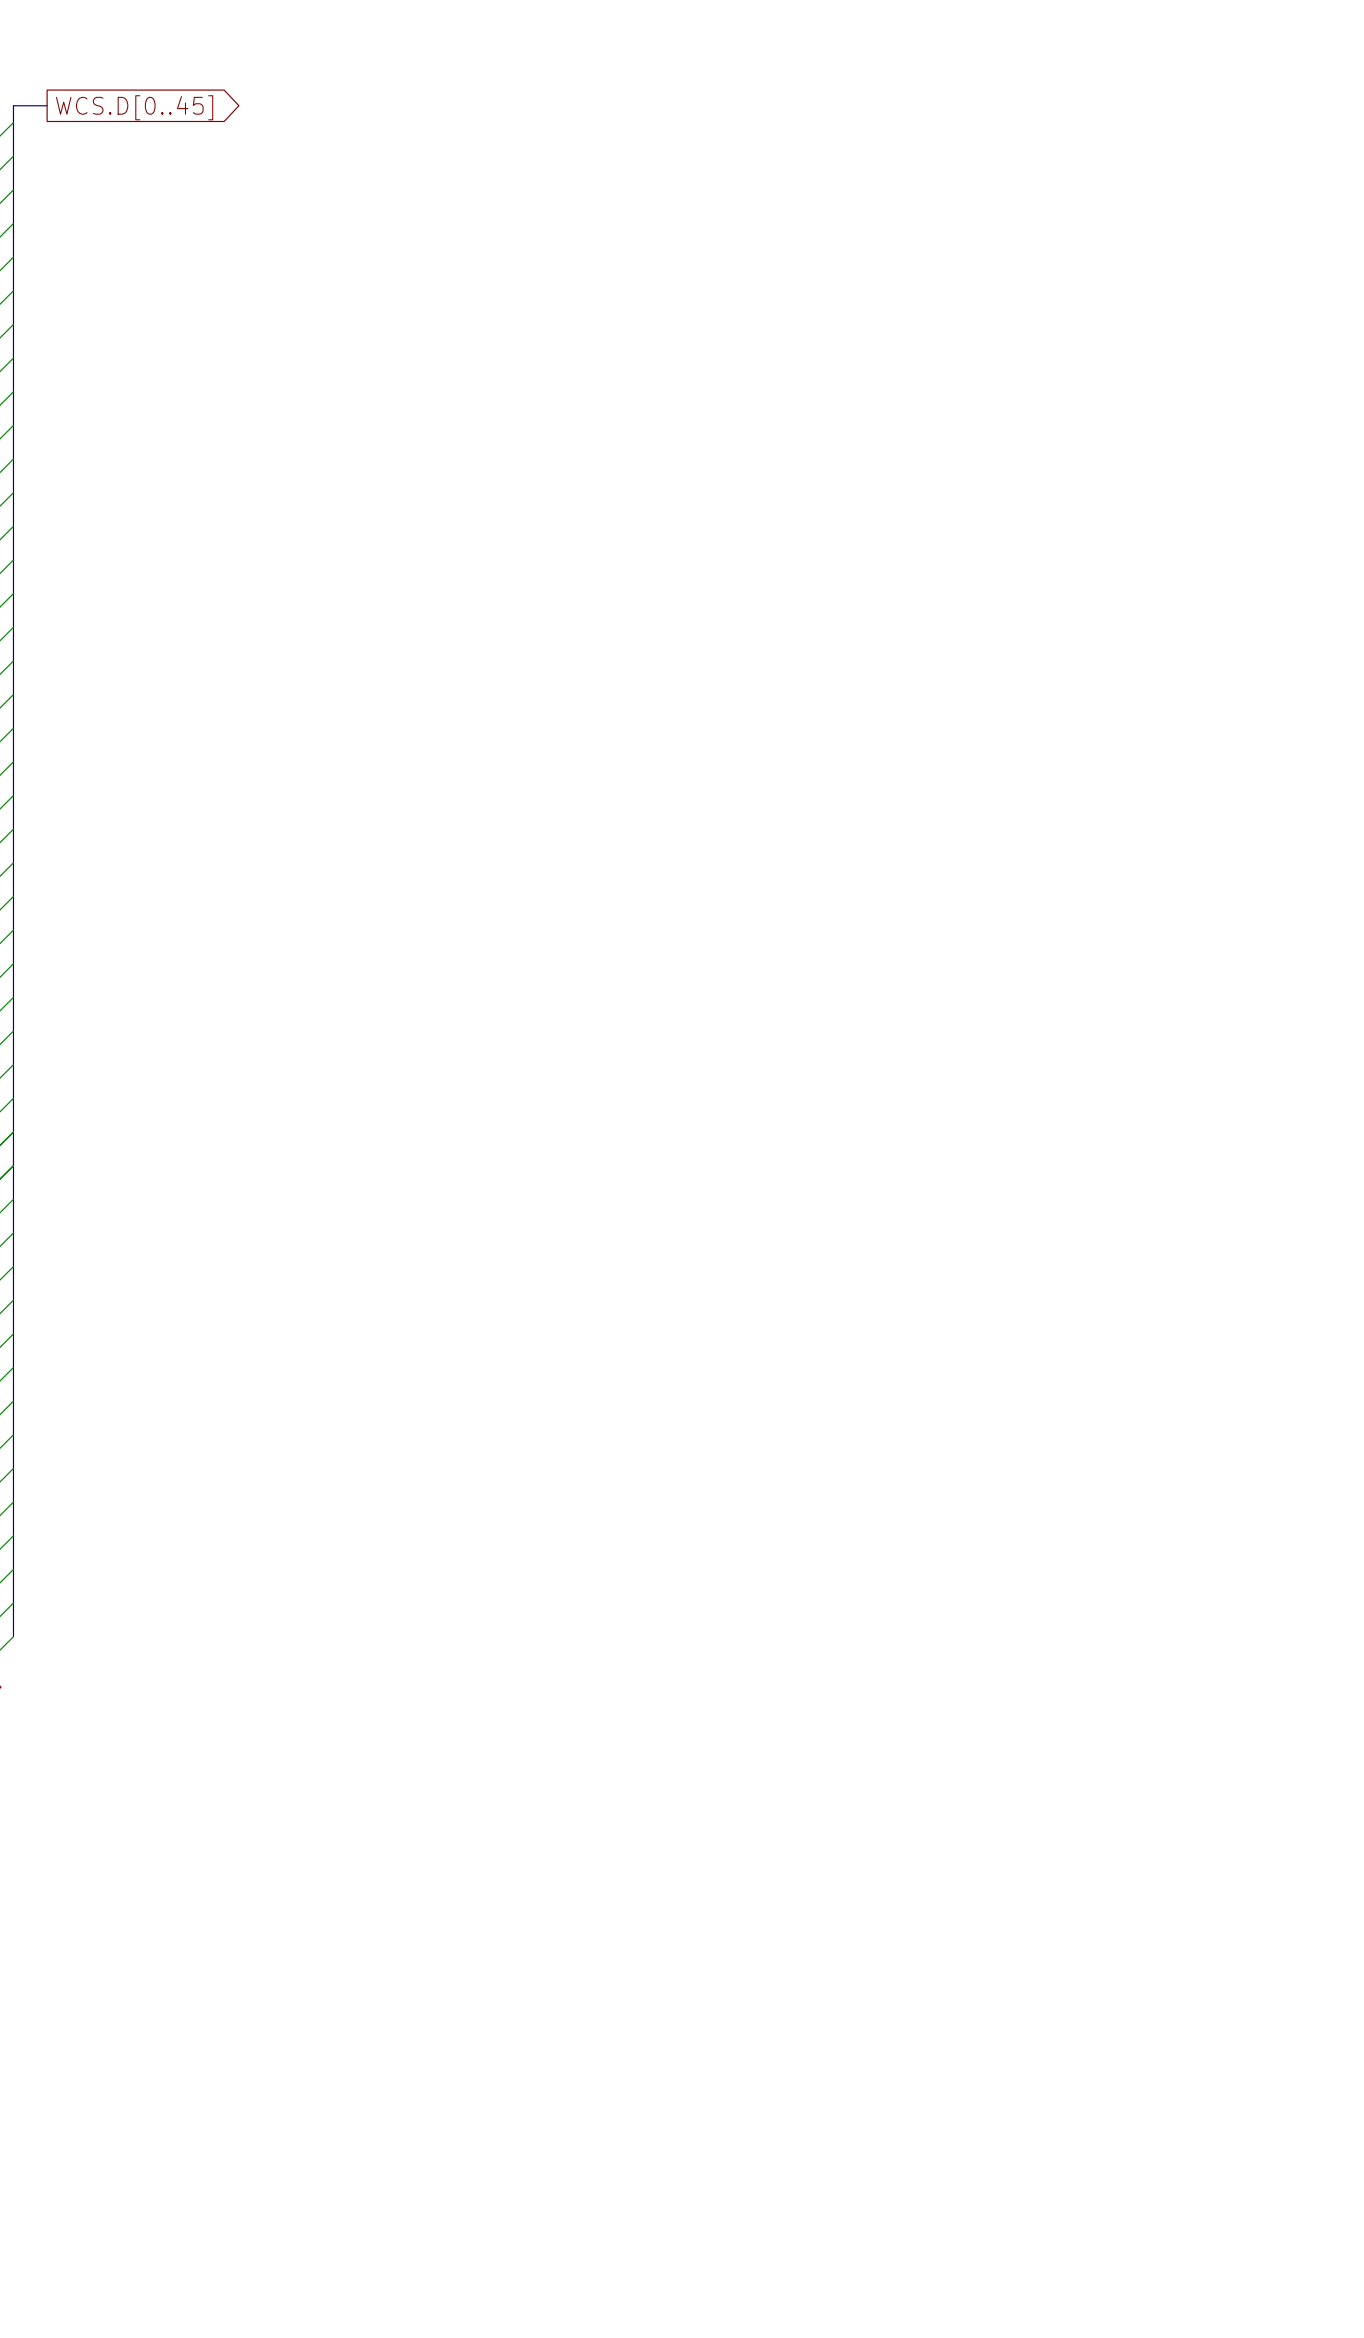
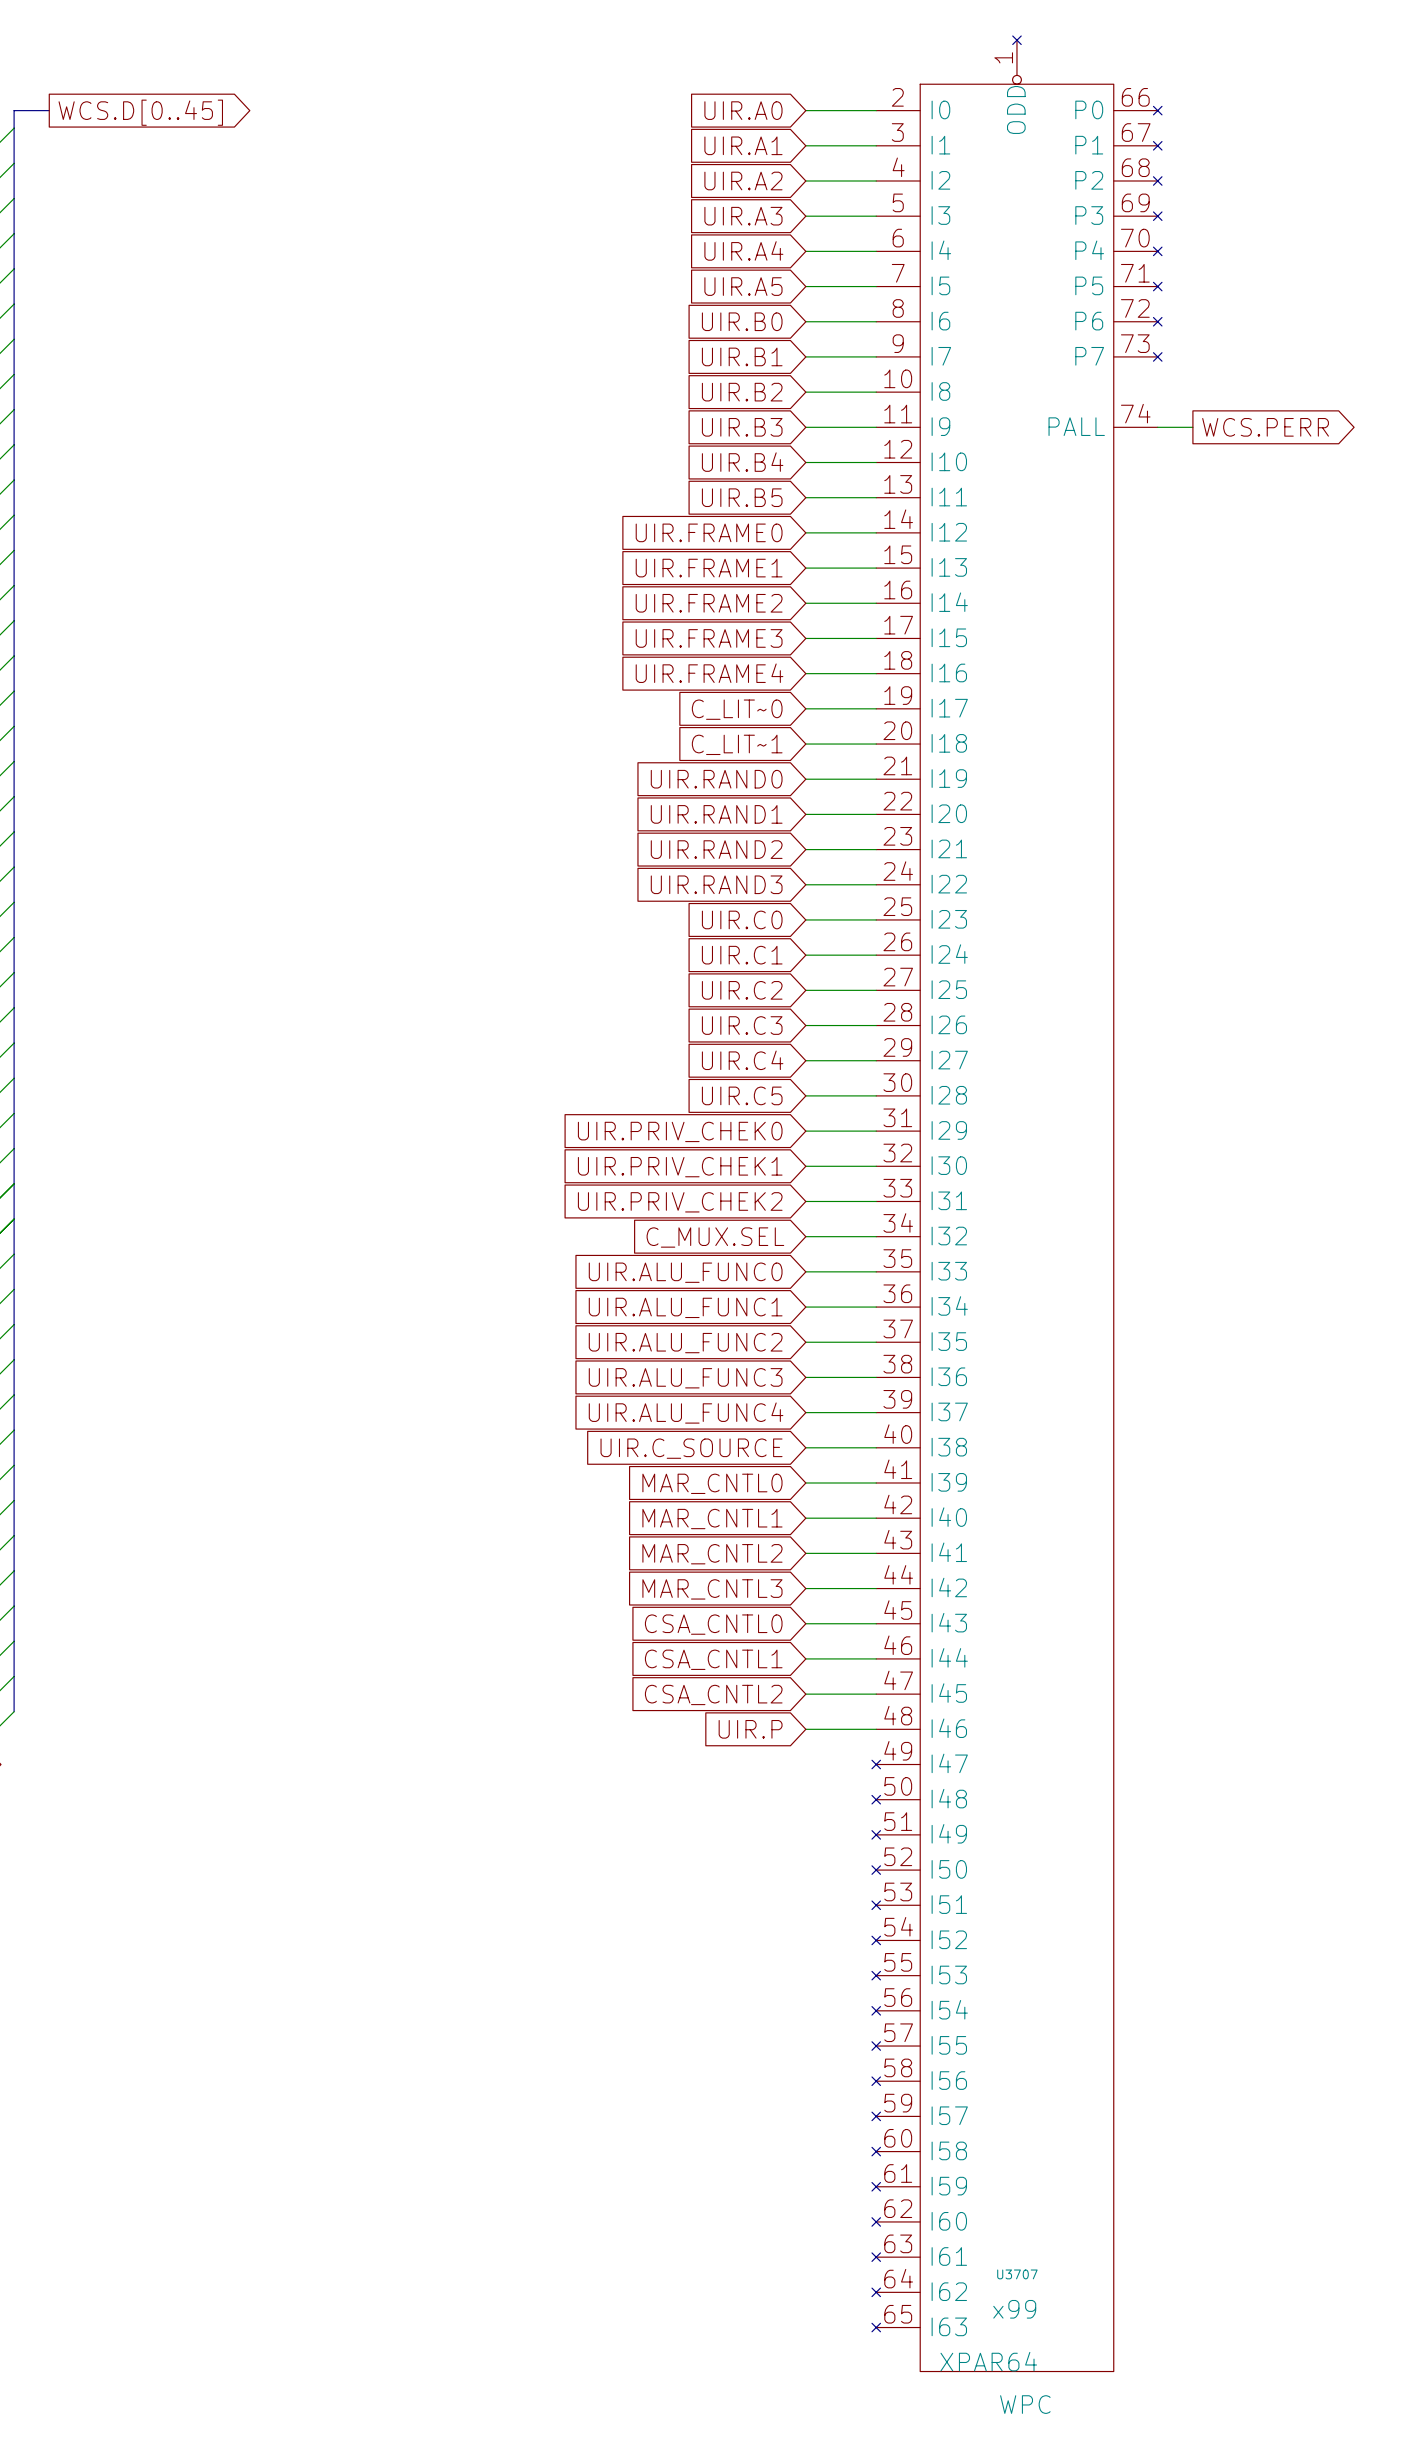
no-connect mark: none -> (1016, 40)
global label: none -> UIR.A0 (743, 110)
wire: none -> (805, 110) (876, 110)
no-connect mark: none -> (1157, 110)
global label: none -> UIR.A1 (743, 145)
wire: none -> (805, 145) (876, 145)
no-connect mark: none -> (1157, 145)
global label: none -> UIR.A2 (743, 180)
wire: none -> (805, 180) (876, 180)
no-connect mark: none -> (1157, 180)
global label: none -> UIR.A3 (743, 216)
wire: none -> (805, 216) (876, 216)
no-connect mark: none -> (1157, 216)
global label: none -> UIR.A4 (743, 250)
wire: none -> (805, 251) (876, 251)
no-connect mark: none -> (1157, 251)
global label: none -> UIR.A5 (743, 286)
wire: none -> (805, 286) (876, 286)
no-connect mark: none -> (1157, 286)
global label: none -> UIR.B0 (742, 321)
wire: none -> (805, 321) (876, 321)
no-connect mark: none -> (1157, 321)
global label: none -> UIR.B1 (742, 356)
wire: none -> (805, 356) (876, 356)
no-connect mark: none -> (1157, 356)
global label: none -> UIR.B2 (742, 392)
wire: none -> (805, 392) (876, 392)
global label: none -> UIR.B3 (742, 427)
wire: none -> (805, 427) (876, 427)
wire: none -> (1157, 427) (1192, 427)
global label: none -> WCS.PERR (1265, 427)
global label: none -> UIR.B4 (742, 462)
wire: none -> (805, 462) (876, 462)
global label: none -> UIR.B5 (742, 497)
wire: none -> (805, 497) (876, 497)
global label: none -> UIR.FRAME0 (709, 532)
wire: none -> (805, 532) (876, 532)
global label: none -> UIR.FRAME1 (709, 568)
wire: none -> (805, 568) (876, 568)
global label: none -> UIR.FRAME2 (709, 603)
wire: none -> (805, 603) (876, 603)
global label: none -> UIR.FRAME3 (709, 638)
wire: none -> (805, 638) (876, 638)
global label: none -> UIR.FRAME4 (709, 673)
wire: none -> (805, 673) (876, 673)
wire: none -> (805, 708) (876, 708)
global label: none -> C_LIT~0 (737, 709)
wire: none -> (805, 744) (876, 744)
global label: none -> C_LIT~1 (737, 744)
global label: none -> UIR.RAND0 (716, 779)
wire: none -> (805, 779) (876, 779)
global label: none -> UIR.RAND1 (716, 814)
wire: none -> (805, 814) (876, 814)
global label: none -> UIR.RAND2 (716, 849)
wire: none -> (805, 849) (876, 849)
global label: none -> UIR.RAND3 (716, 884)
wire: none -> (805, 884) (876, 884)
global label: none -> UIR.C0 (742, 919)
wire: none -> (805, 919) (876, 919)
global label: none -> UIR.C1 (742, 955)
wire: none -> (805, 955) (876, 955)
global label: none -> UIR.C2 (742, 990)
wire: none -> (805, 990) (876, 990)
global label: none -> UIR.C3 (742, 1025)
wire: none -> (805, 1025) (876, 1025)
global label: none -> UIR.C4 (742, 1060)
wire: none -> (805, 1060) (876, 1060)
global label: none -> UIR.C5 (742, 1095)
wire: none -> (805, 1095) (876, 1095)
wire: none -> (805, 1131) (876, 1131)
global label: none -> UIR.PRIV_CHEK0 (680, 1131)
global label: none -> UIR.PRIV_CHEK1 (680, 1167)
wire: none -> (805, 1166) (876, 1166)
wire: none -> (805, 1201) (876, 1201)
global label: none -> UIR.PRIV_CHEK2 (680, 1202)
U3707: none -> XPAR64 (1016, 1205)
wire: none -> (805, 1236) (876, 1236)
global label: none -> C_MUX.SEL (715, 1237)
global label: none -> UIR.ALU_FUNC0 (685, 1272)
wire: none -> (805, 1271) (876, 1271)
wire: none -> (805, 1307) (876, 1307)
global label: none -> UIR.ALU_FUNC1 (685, 1307)
wire: none -> (805, 1342) (876, 1342)
global label: none -> UIR.ALU_FUNC2 (685, 1343)
global label: none -> UIR.ALU_FUNC3 (685, 1378)
wire: none -> (805, 1377) (876, 1377)
wire: none -> (805, 1412) (876, 1412)
global label: none -> UIR.ALU_FUNC4 (686, 1413)
wire: none -> (805, 1447) (876, 1447)
global label: none -> UIR.C_SOURCE (691, 1448)
wire: none -> (805, 1482) (876, 1482)
global label: none -> MAR_CNTL0 (712, 1483)
wire: none -> (805, 1518) (876, 1518)
global label: none -> MAR_CNTL1 (712, 1519)
wire: none -> (805, 1553) (876, 1553)
global label: none -> MAR_CNTL2 (712, 1554)
wire: none -> (805, 1588) (876, 1588)
global label: none -> MAR_CNTL3 (712, 1589)
wire: none -> (805, 1623) (876, 1623)
global label: none -> CSA_CNTL0 (713, 1624)
wire: none -> (805, 1658) (876, 1658)
global label: none -> CSA_CNTL1 (713, 1659)
wire: none -> (805, 1694) (876, 1694)
global label: none -> CSA_CNTL2 (713, 1694)
global label: none -> UIR.P (750, 1729)
wire: none -> (805, 1729) (876, 1729)
no-connect mark: none -> (876, 1764)
no-connect mark: none -> (876, 1799)
no-connect mark: none -> (876, 1834)
no-connect mark: none -> (876, 1870)
no-connect mark: none -> (876, 1905)
no-connect mark: none -> (876, 1940)
no-connect mark: none -> (876, 1975)
no-connect mark: none -> (876, 2010)
no-connect mark: none -> (876, 2046)
no-connect mark: none -> (876, 2081)
no-connect mark: none -> (876, 2116)
no-connect mark: none -> (876, 2151)
no-connect mark: none -> (876, 2186)
no-connect mark: none -> (876, 2221)
no-connect mark: none -> (876, 2257)
no-connect mark: none -> (876, 2292)
no-connect mark: none -> (876, 2327)

